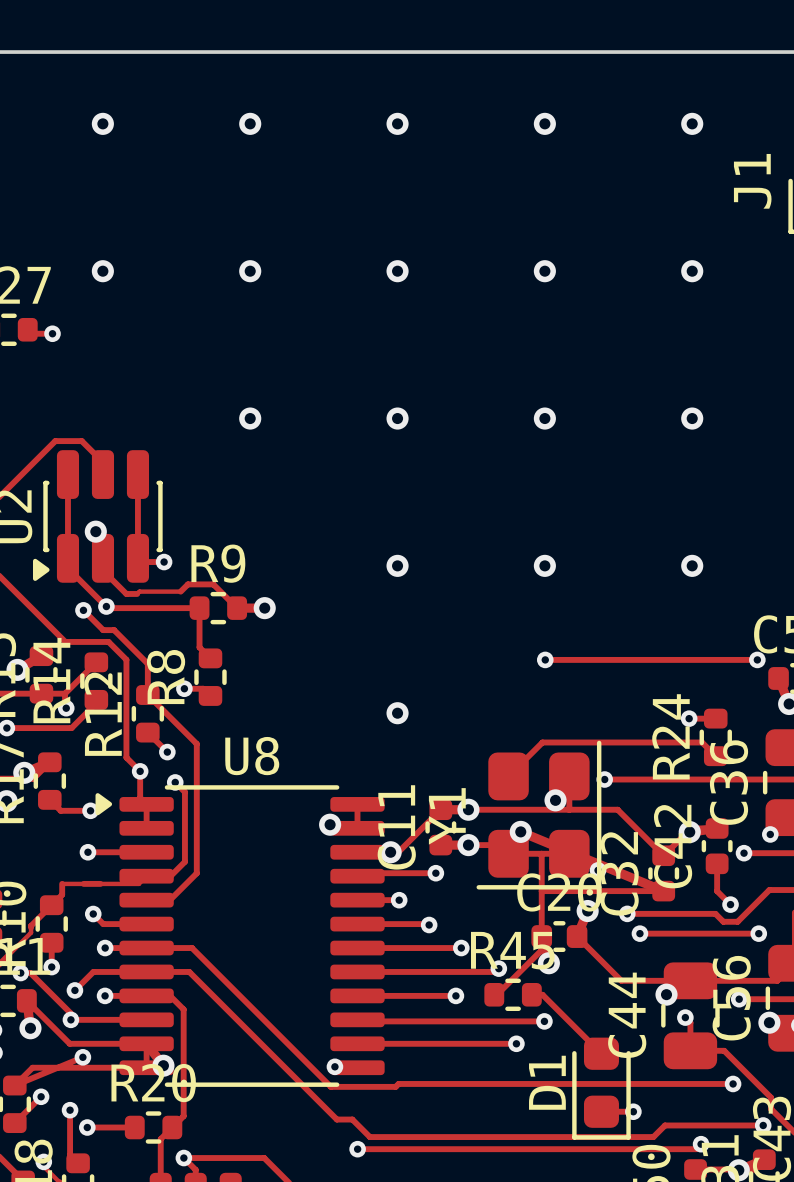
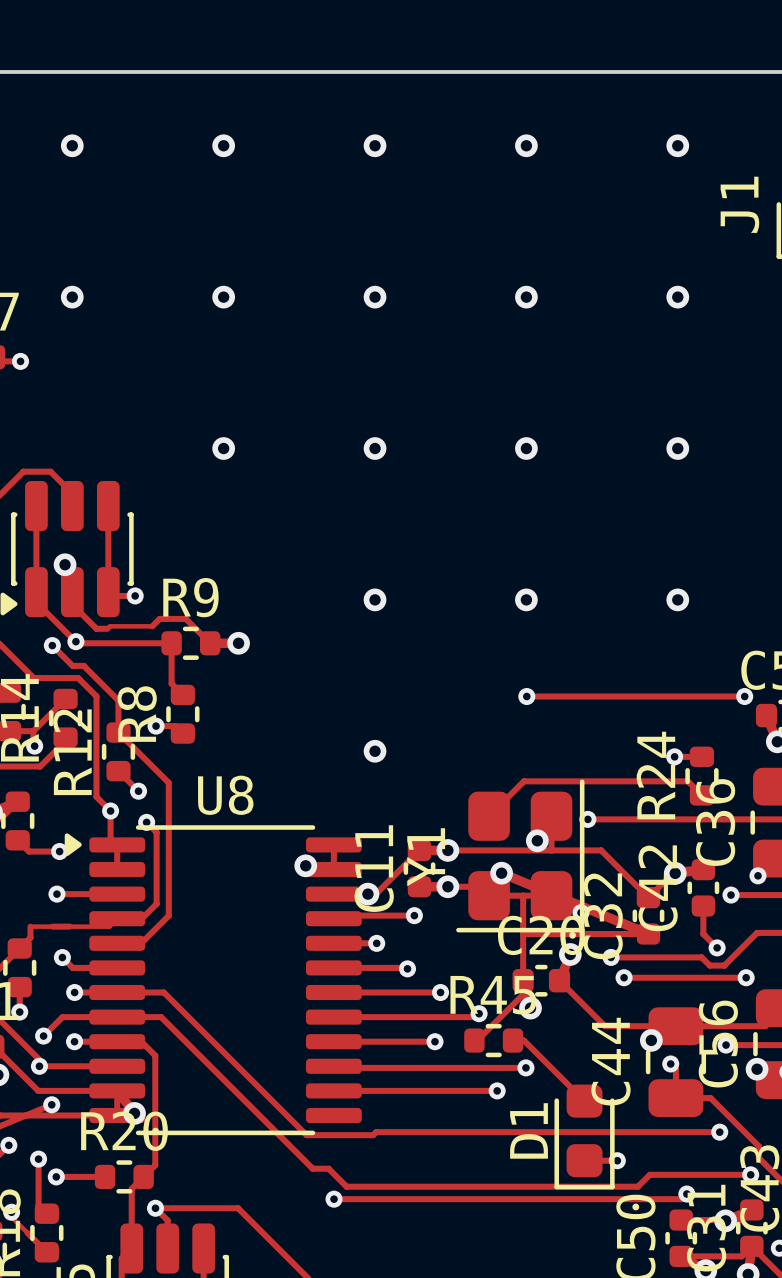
via: (334, 1066) -> none

